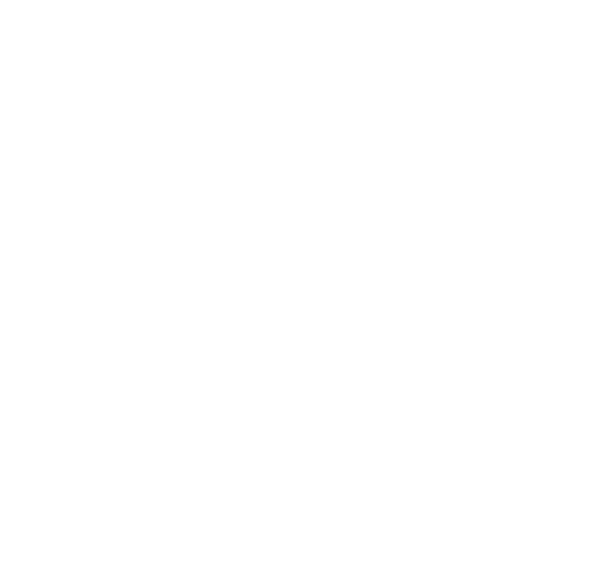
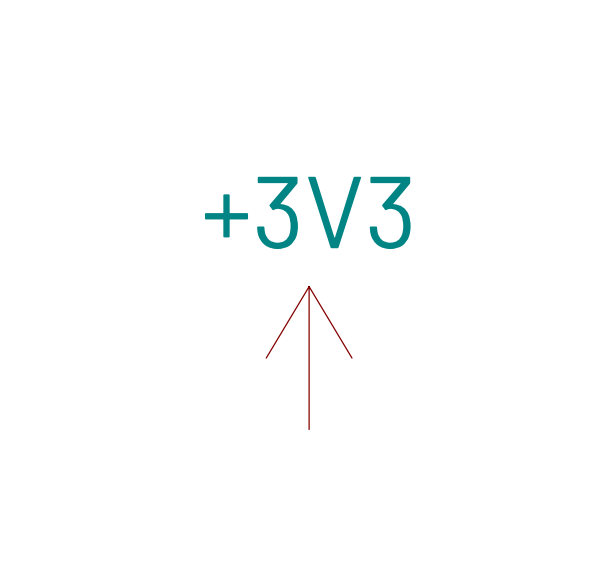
power symbol: none -> +3V3 (309, 358)

